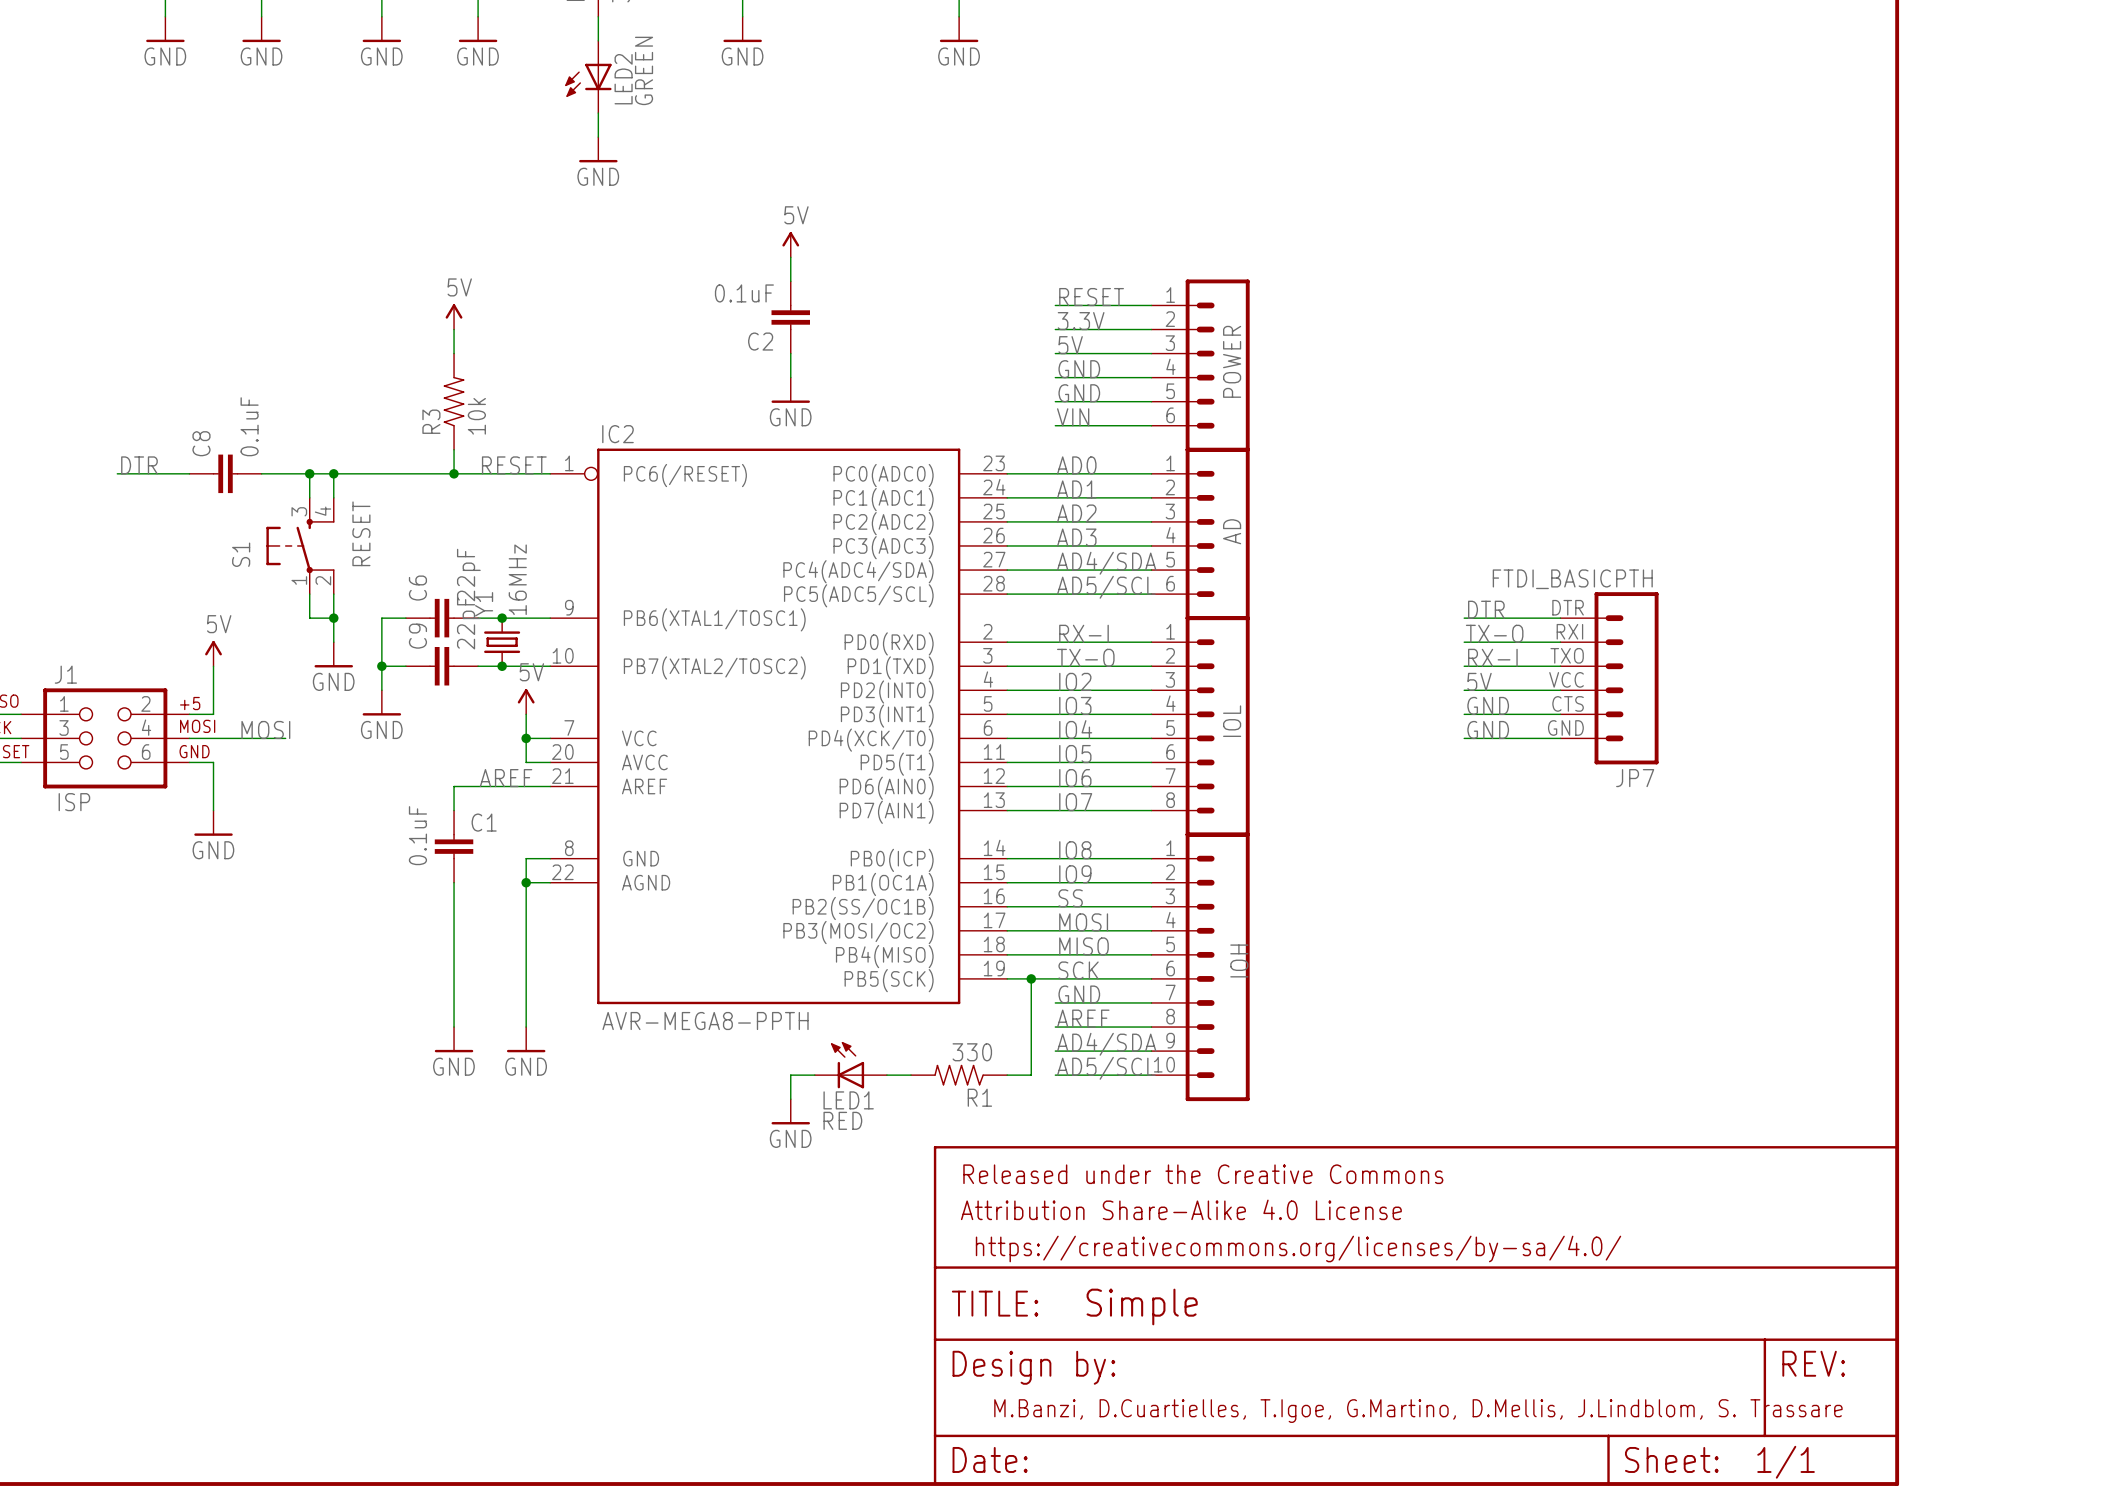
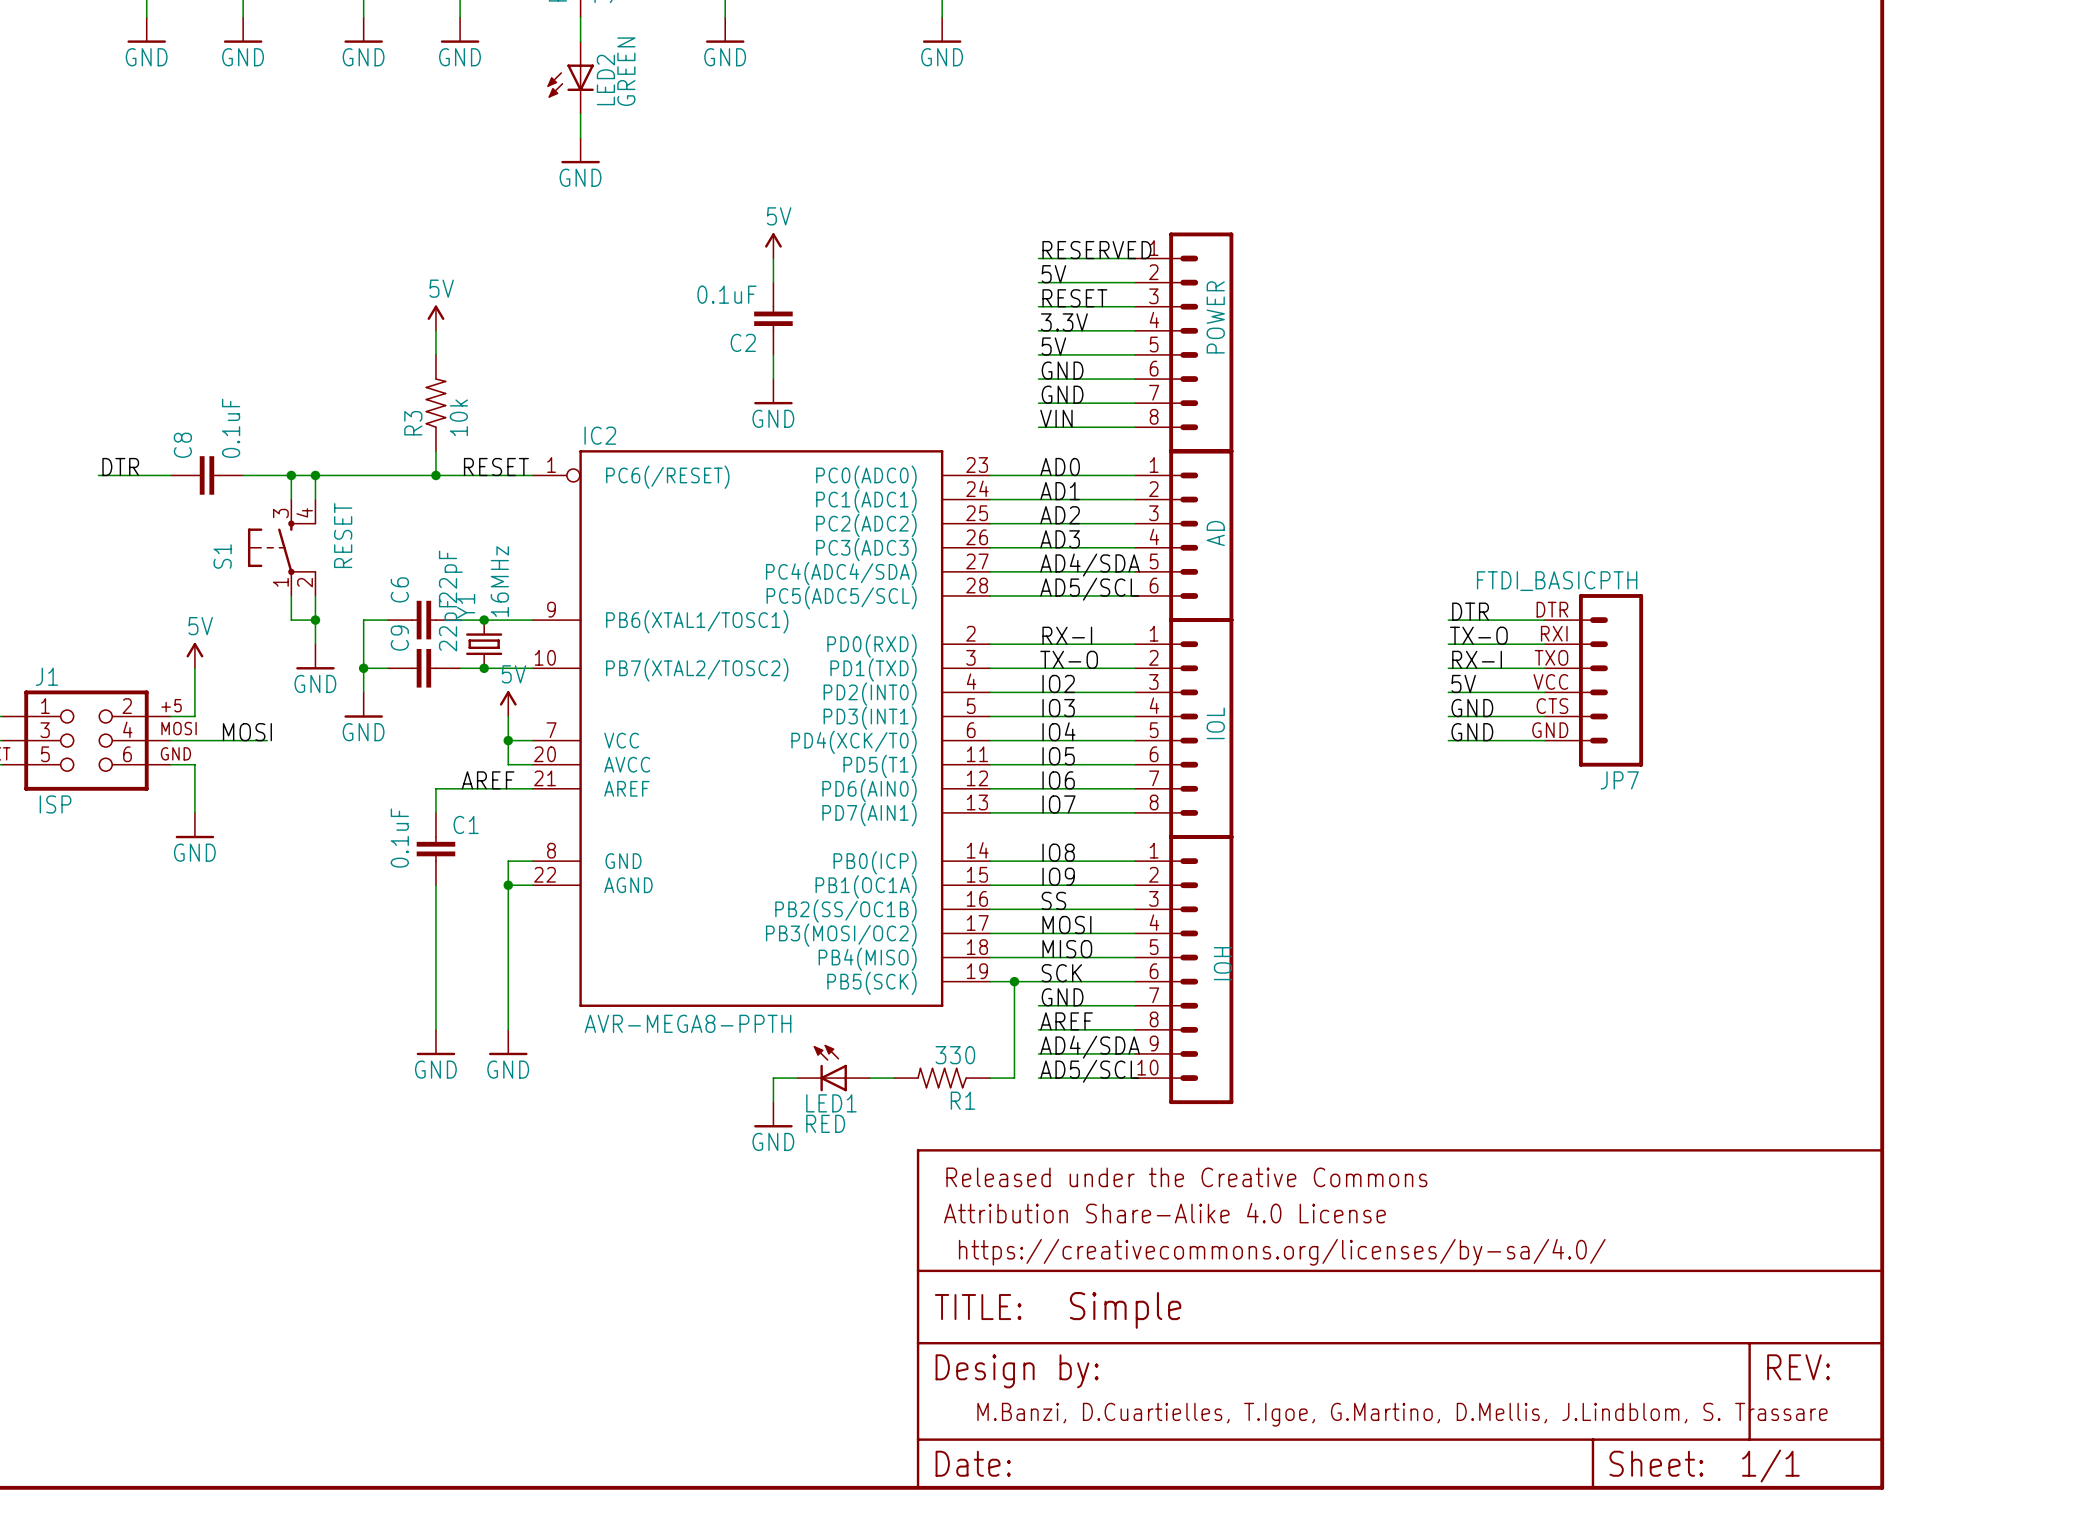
label: none -> RESERVED (1096, 250)
wire: none -> (1038, 258) (1134, 258)
label: none -> 5V (1053, 274)
wire: none -> (1038, 282) (1134, 282)
POWER: none -> (1184, 342)
POWER: (1200, 365) -> none

